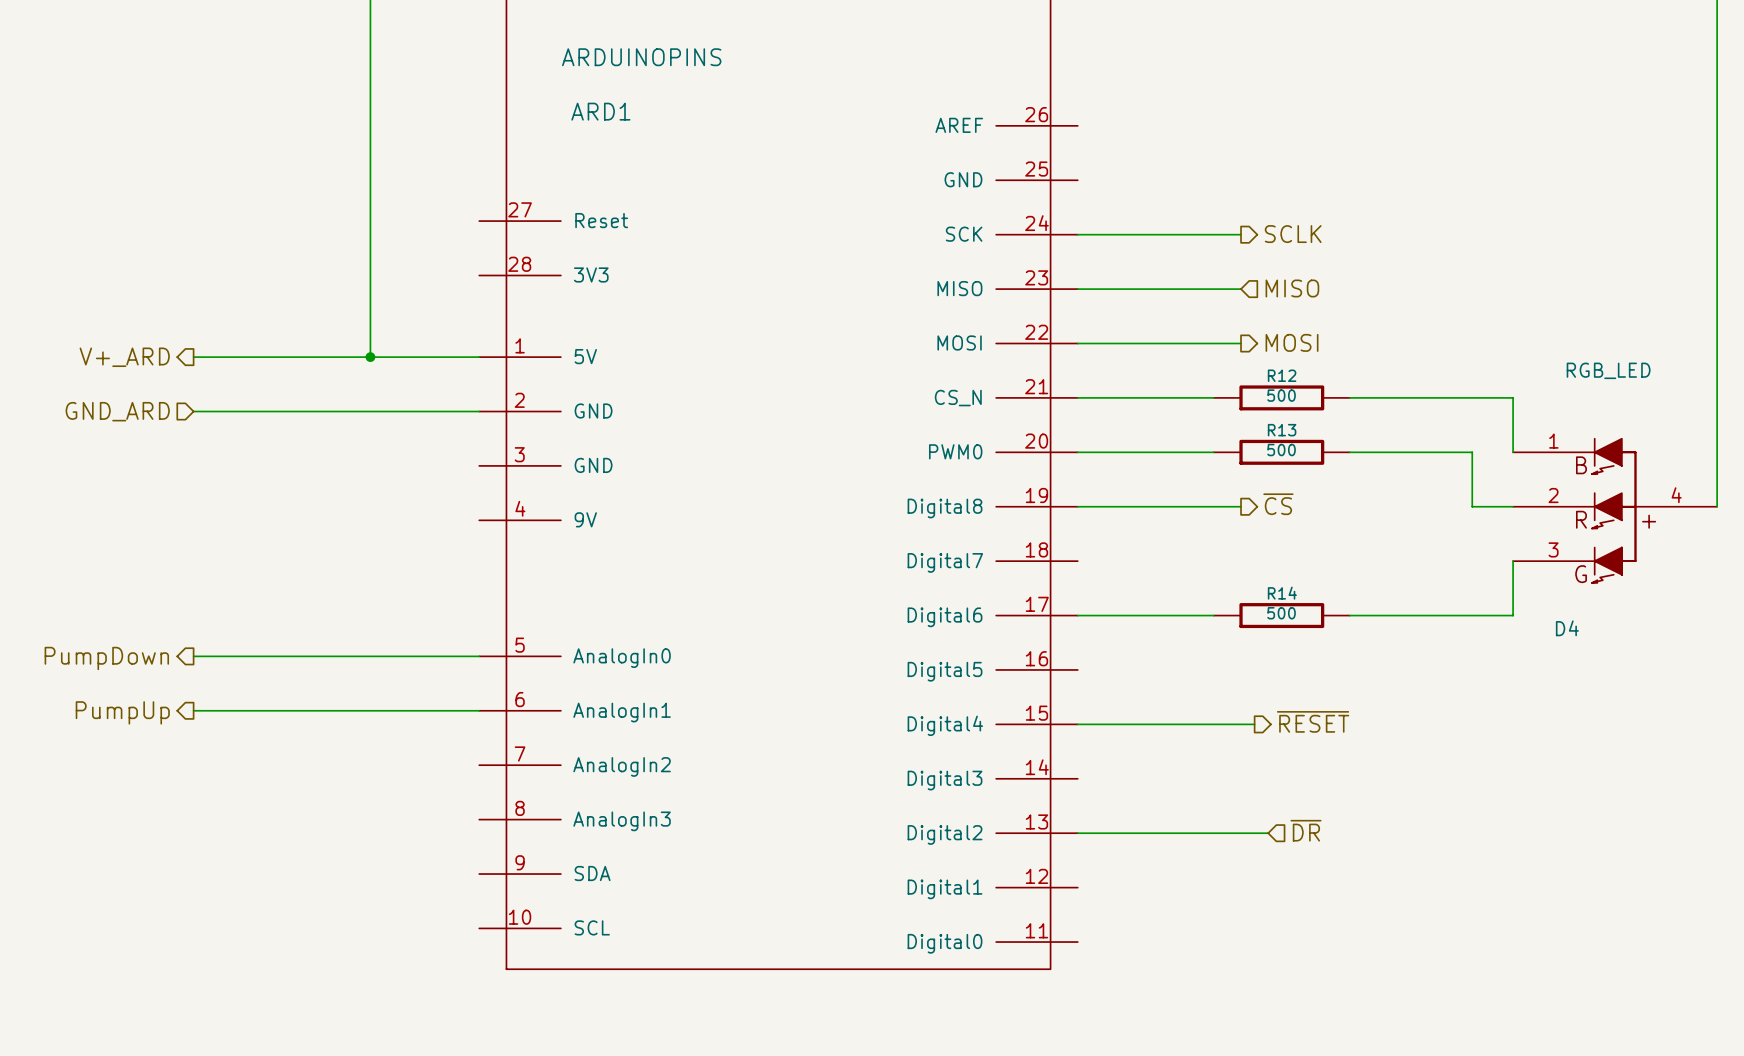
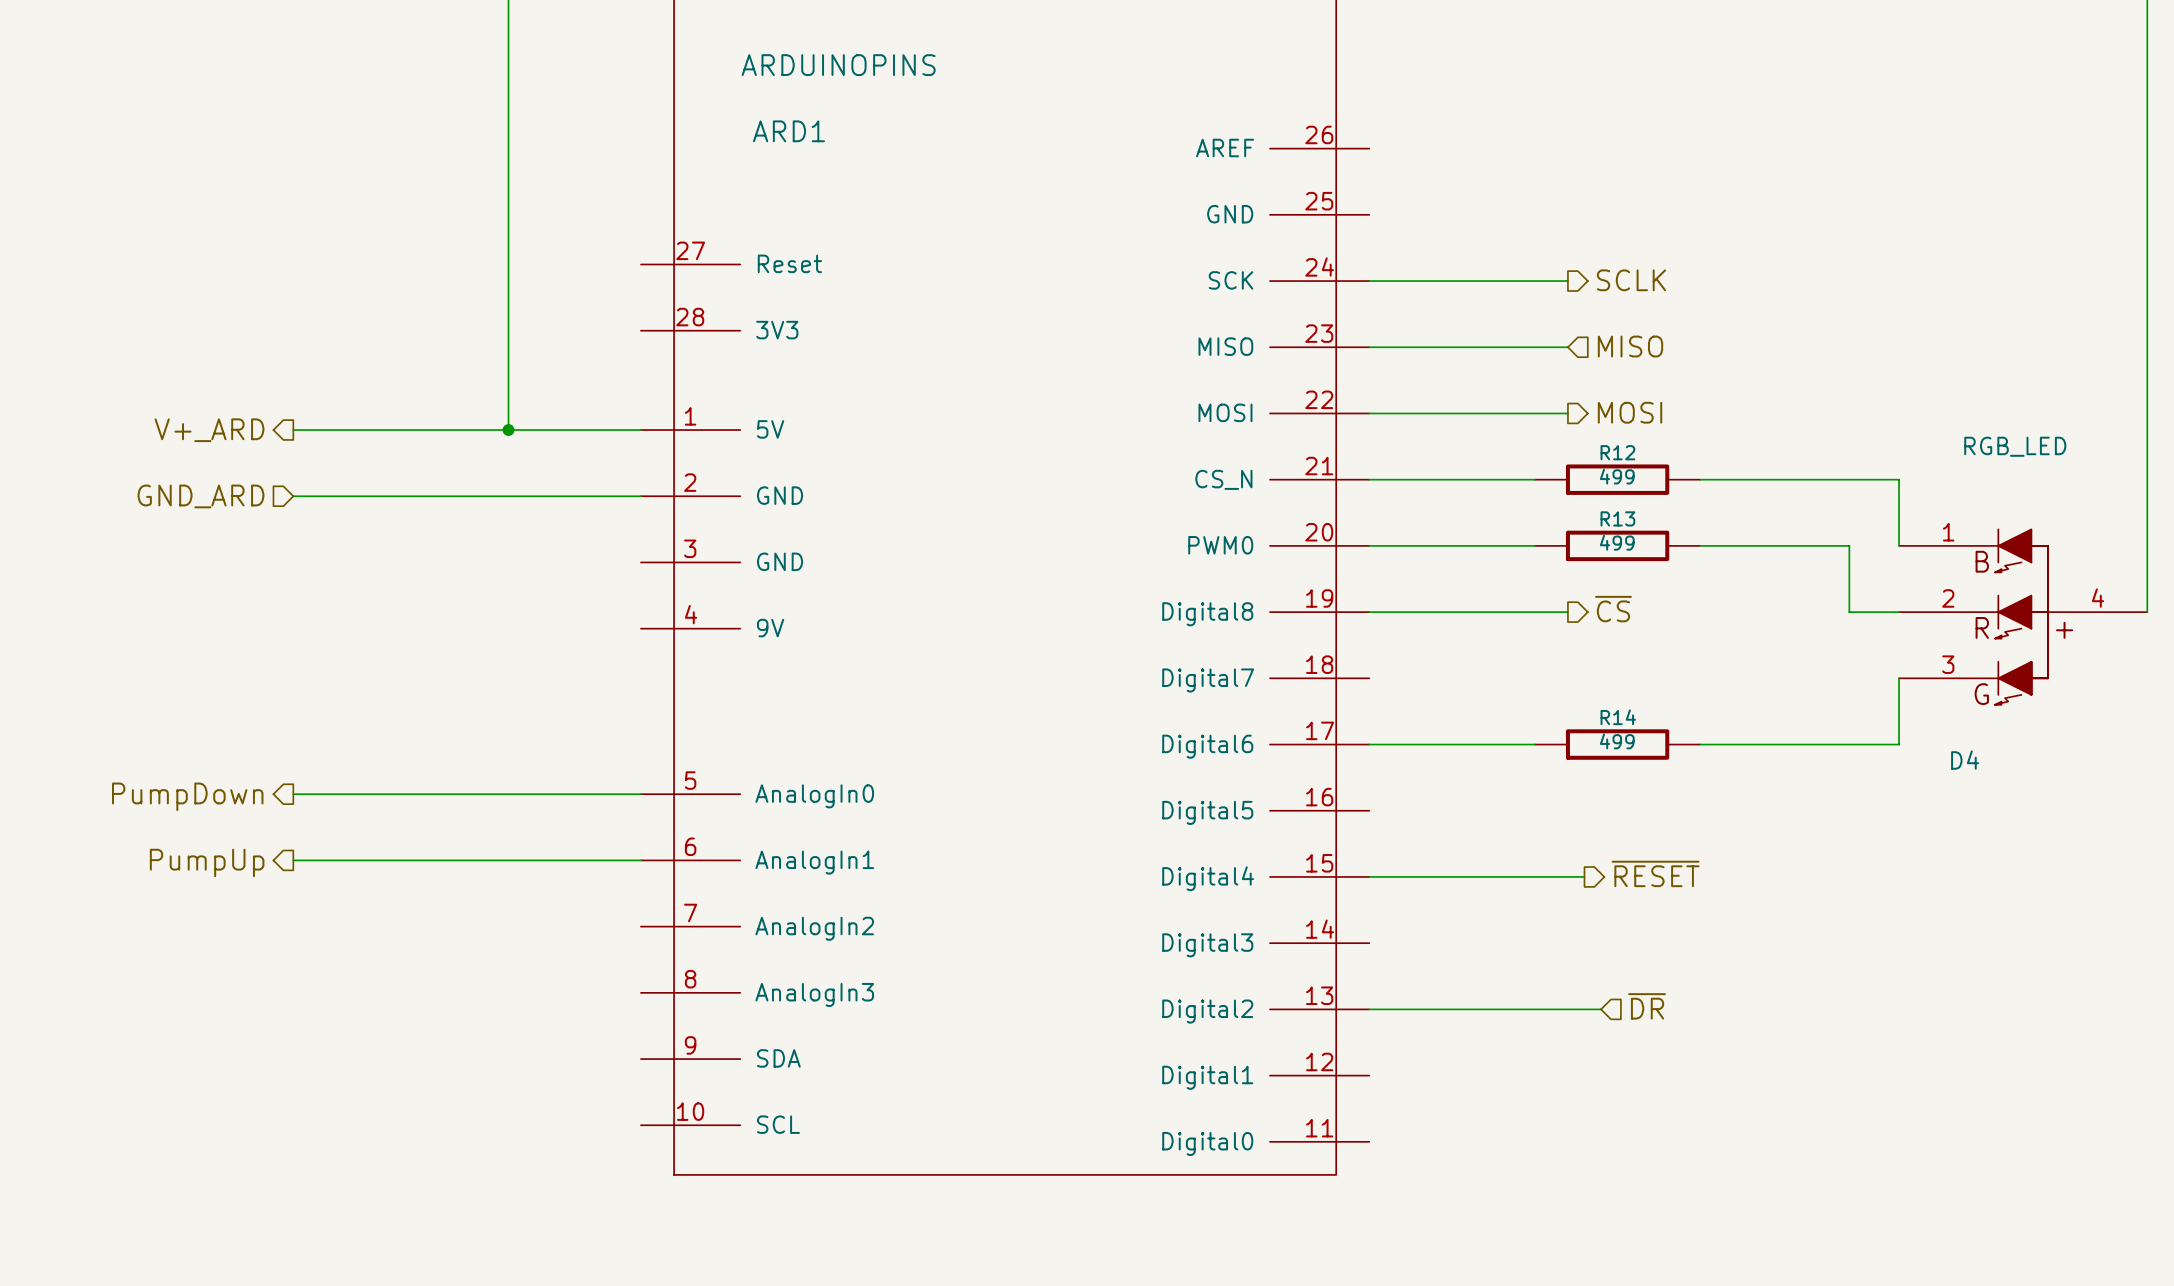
R12 value: 500 (1281, 395) -> 499 (1617, 476)
R13 value: 500 (1281, 450) -> 499 (1617, 542)
R14 value: 500 (1281, 613) -> 499 (1617, 741)

